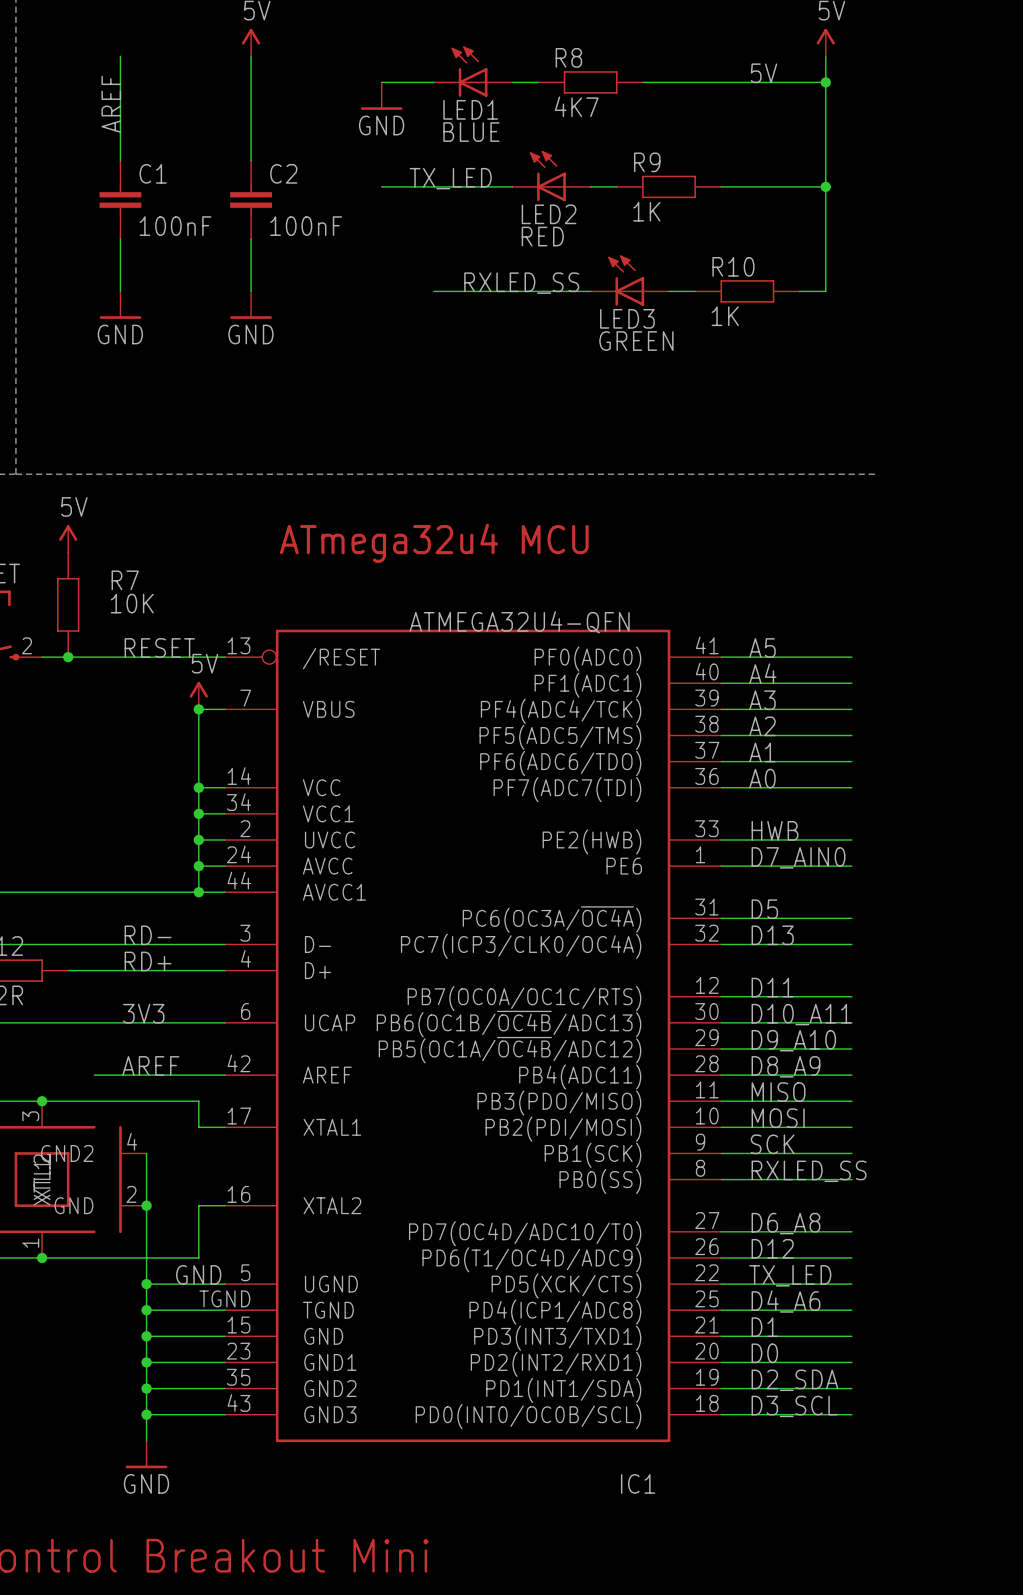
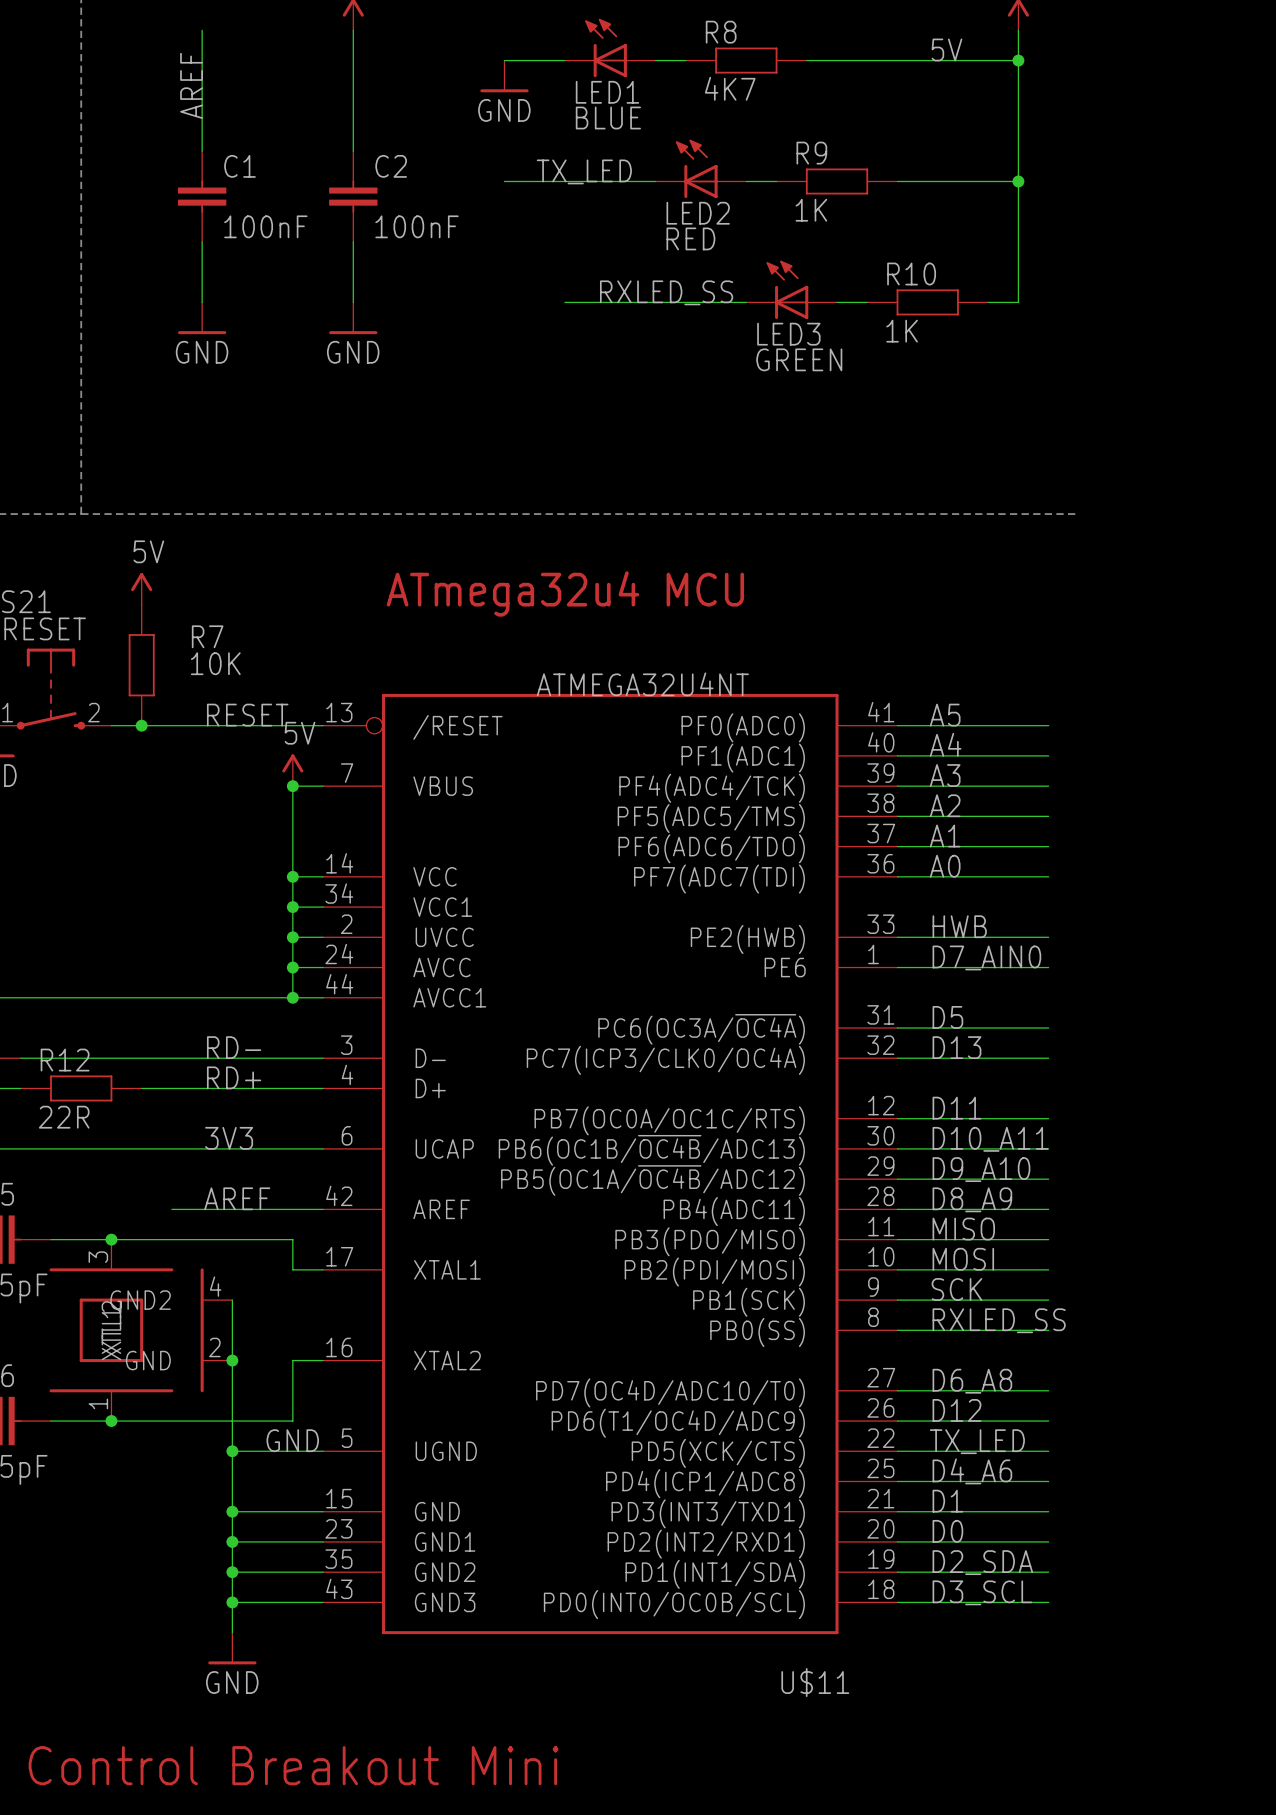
IC1: ATMEGA32U4-QFN (473, 1035) -> none
U$11: none -> ATMEGA32U4NT (610, 1164)
wire: (146, 1310) (224, 1310) -> none
junction: (146, 1310) -> none

